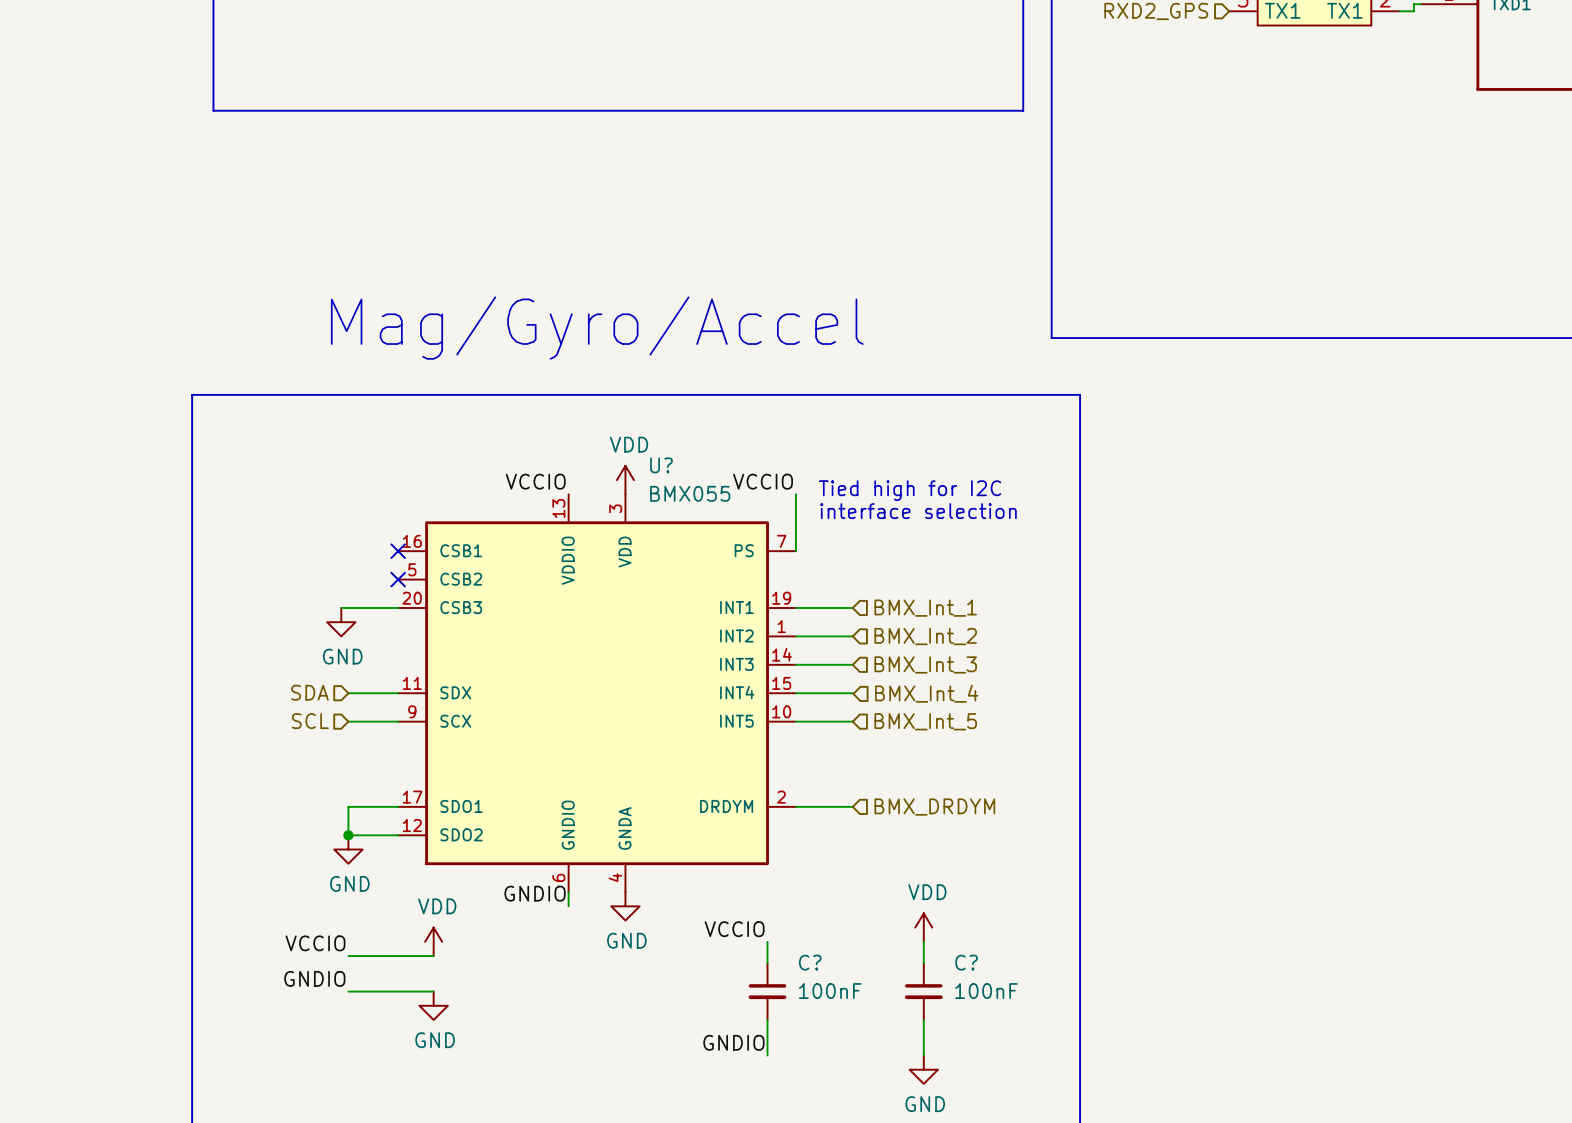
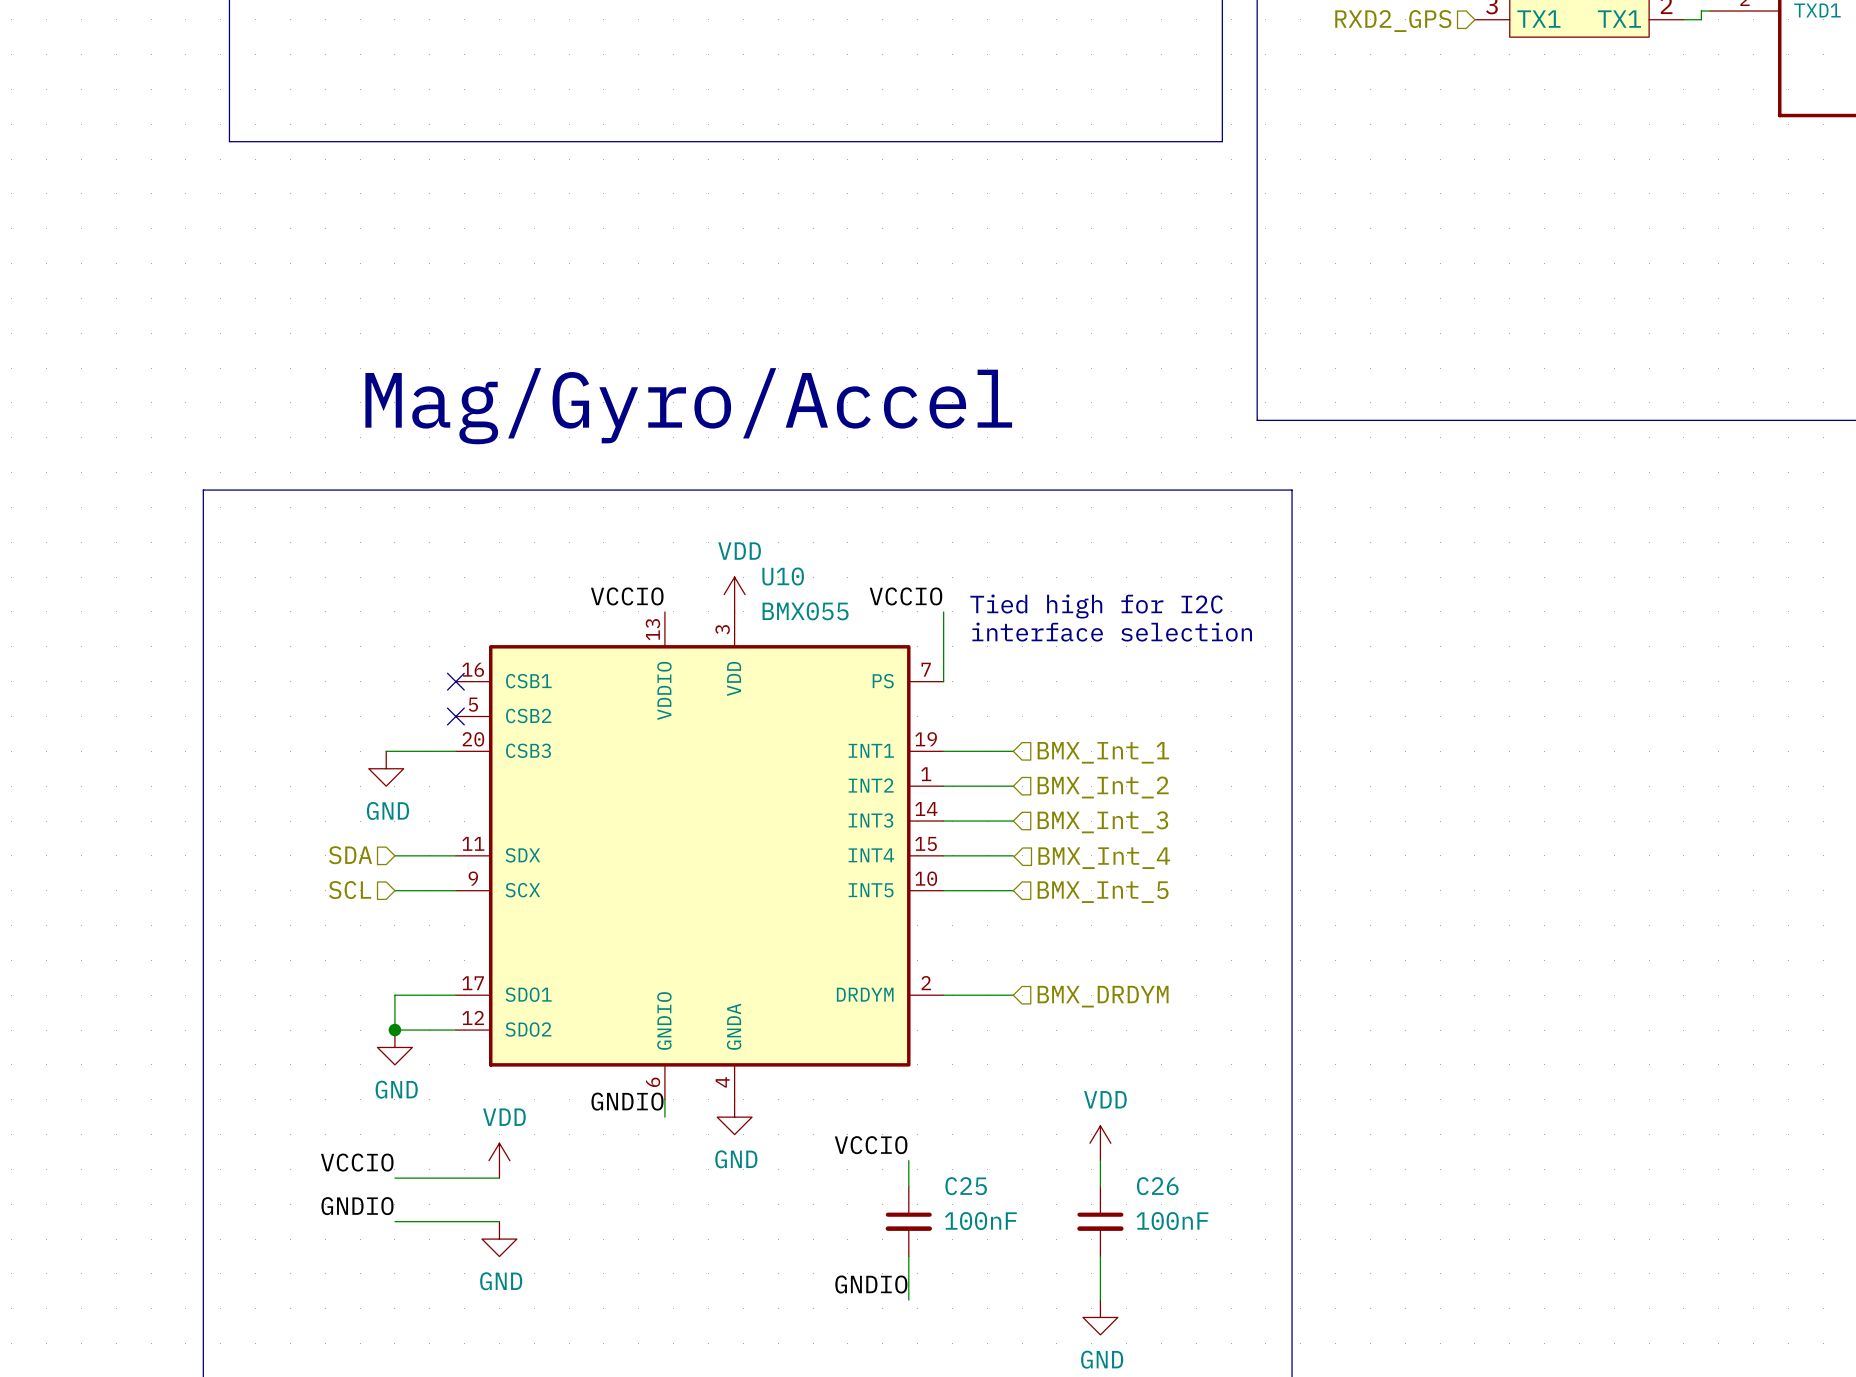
U? name: U? (661, 465) -> U10 (783, 576)
C? name: C? (810, 962) -> C25 (966, 1186)
C? name: C? (966, 962) -> C26 (1157, 1186)

